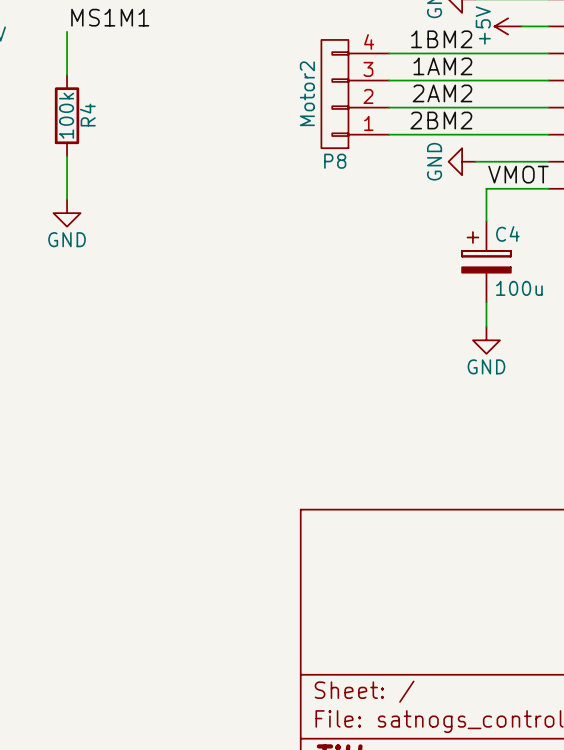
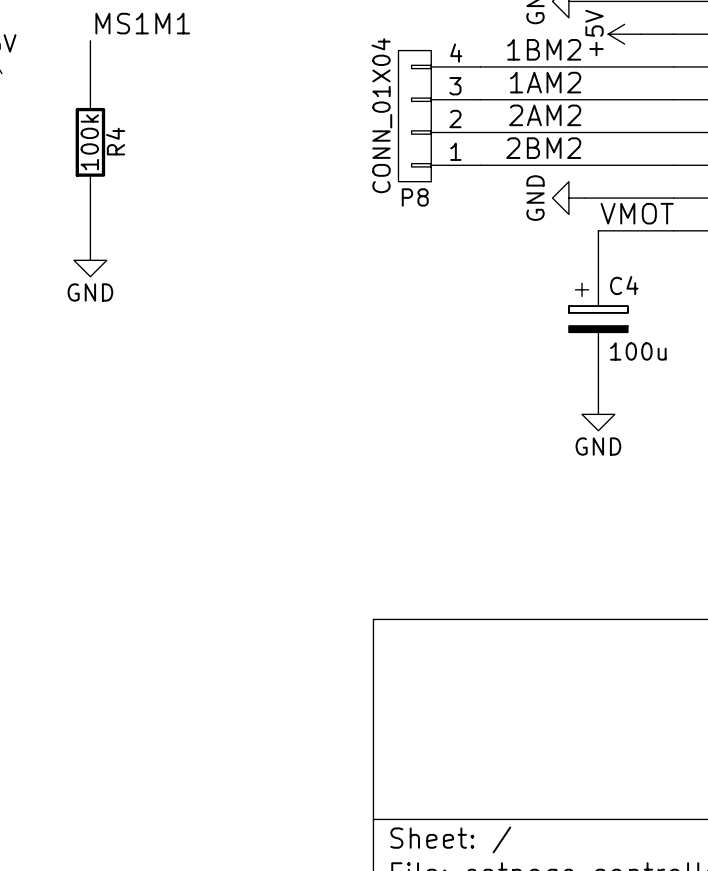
P8 value: Motor2 (307, 93) -> CONN_01X04 (381, 115)

